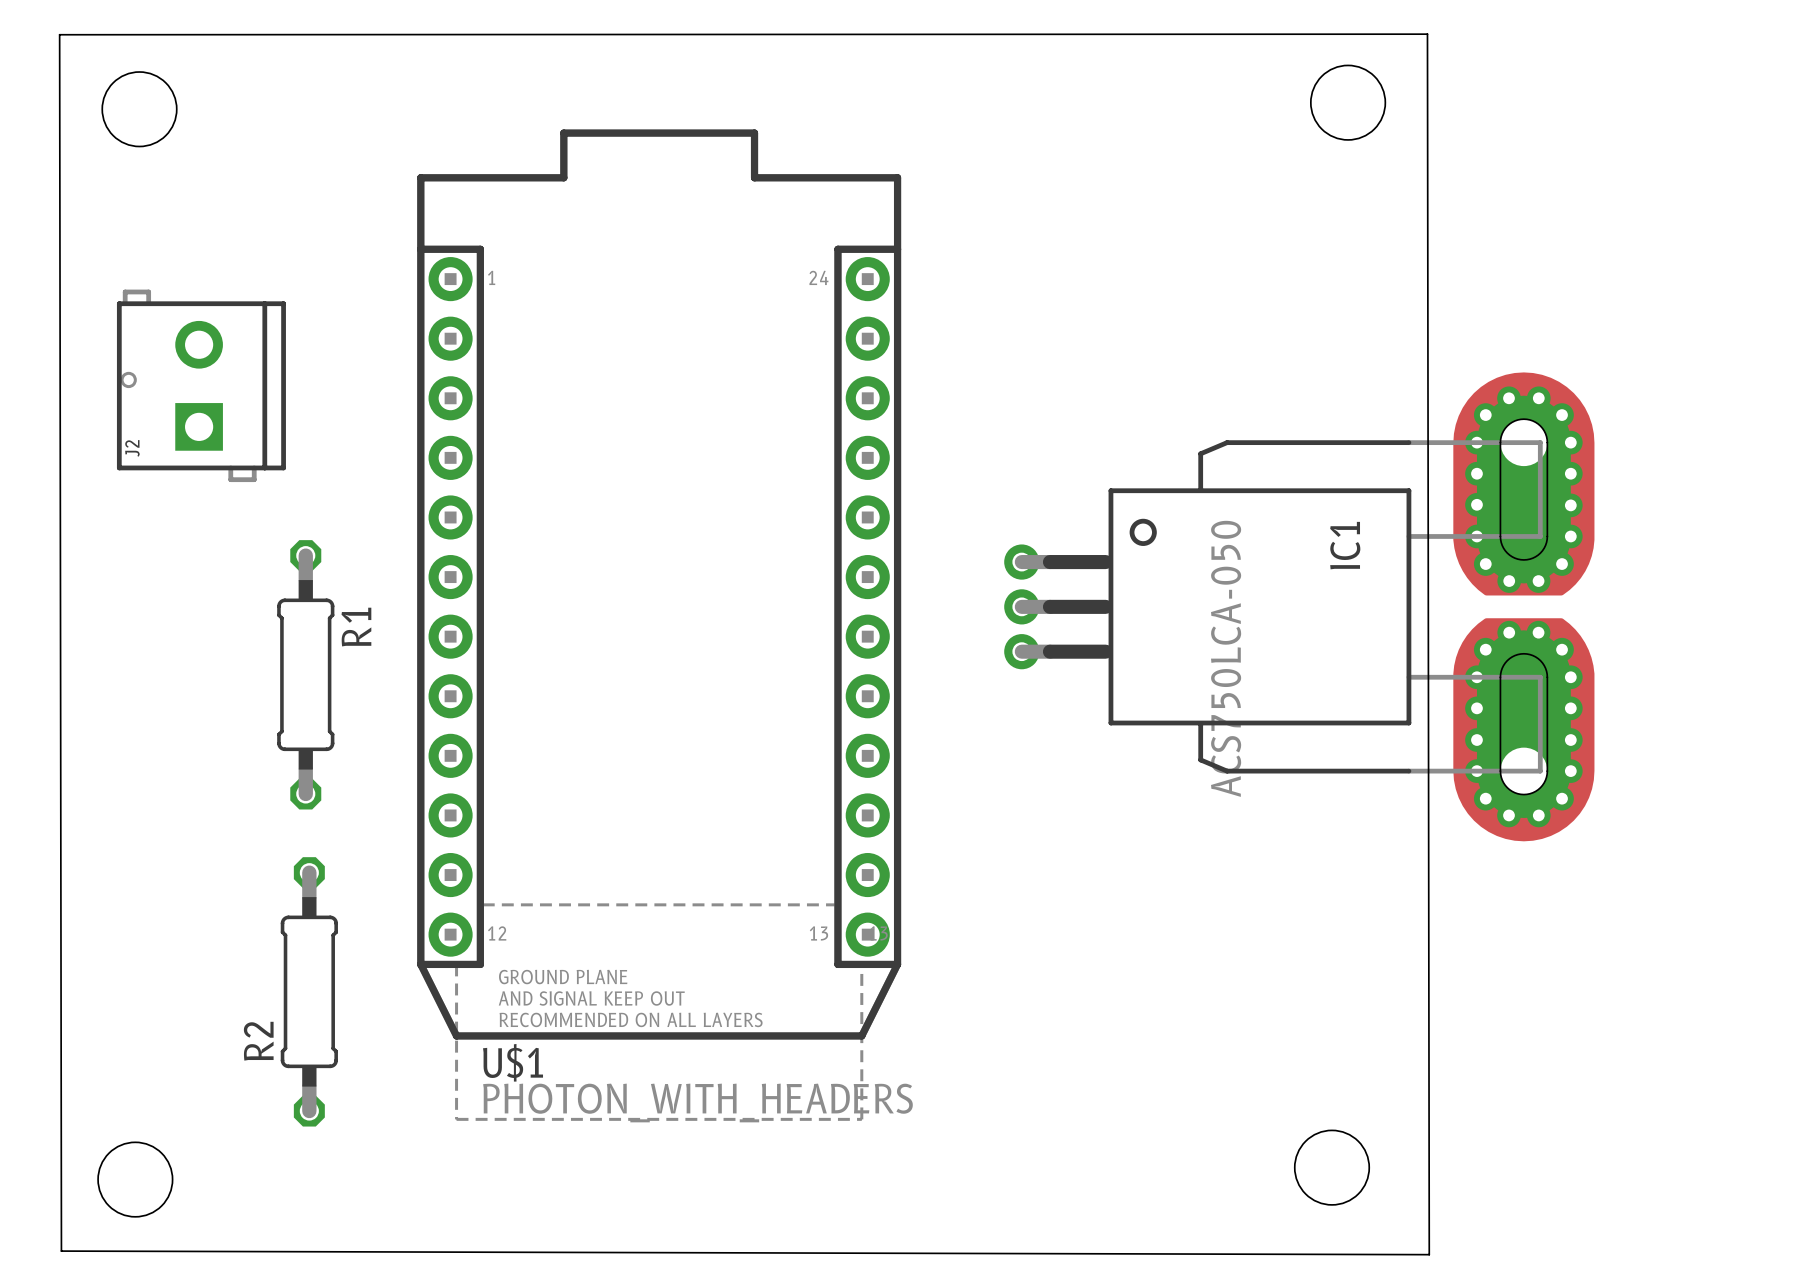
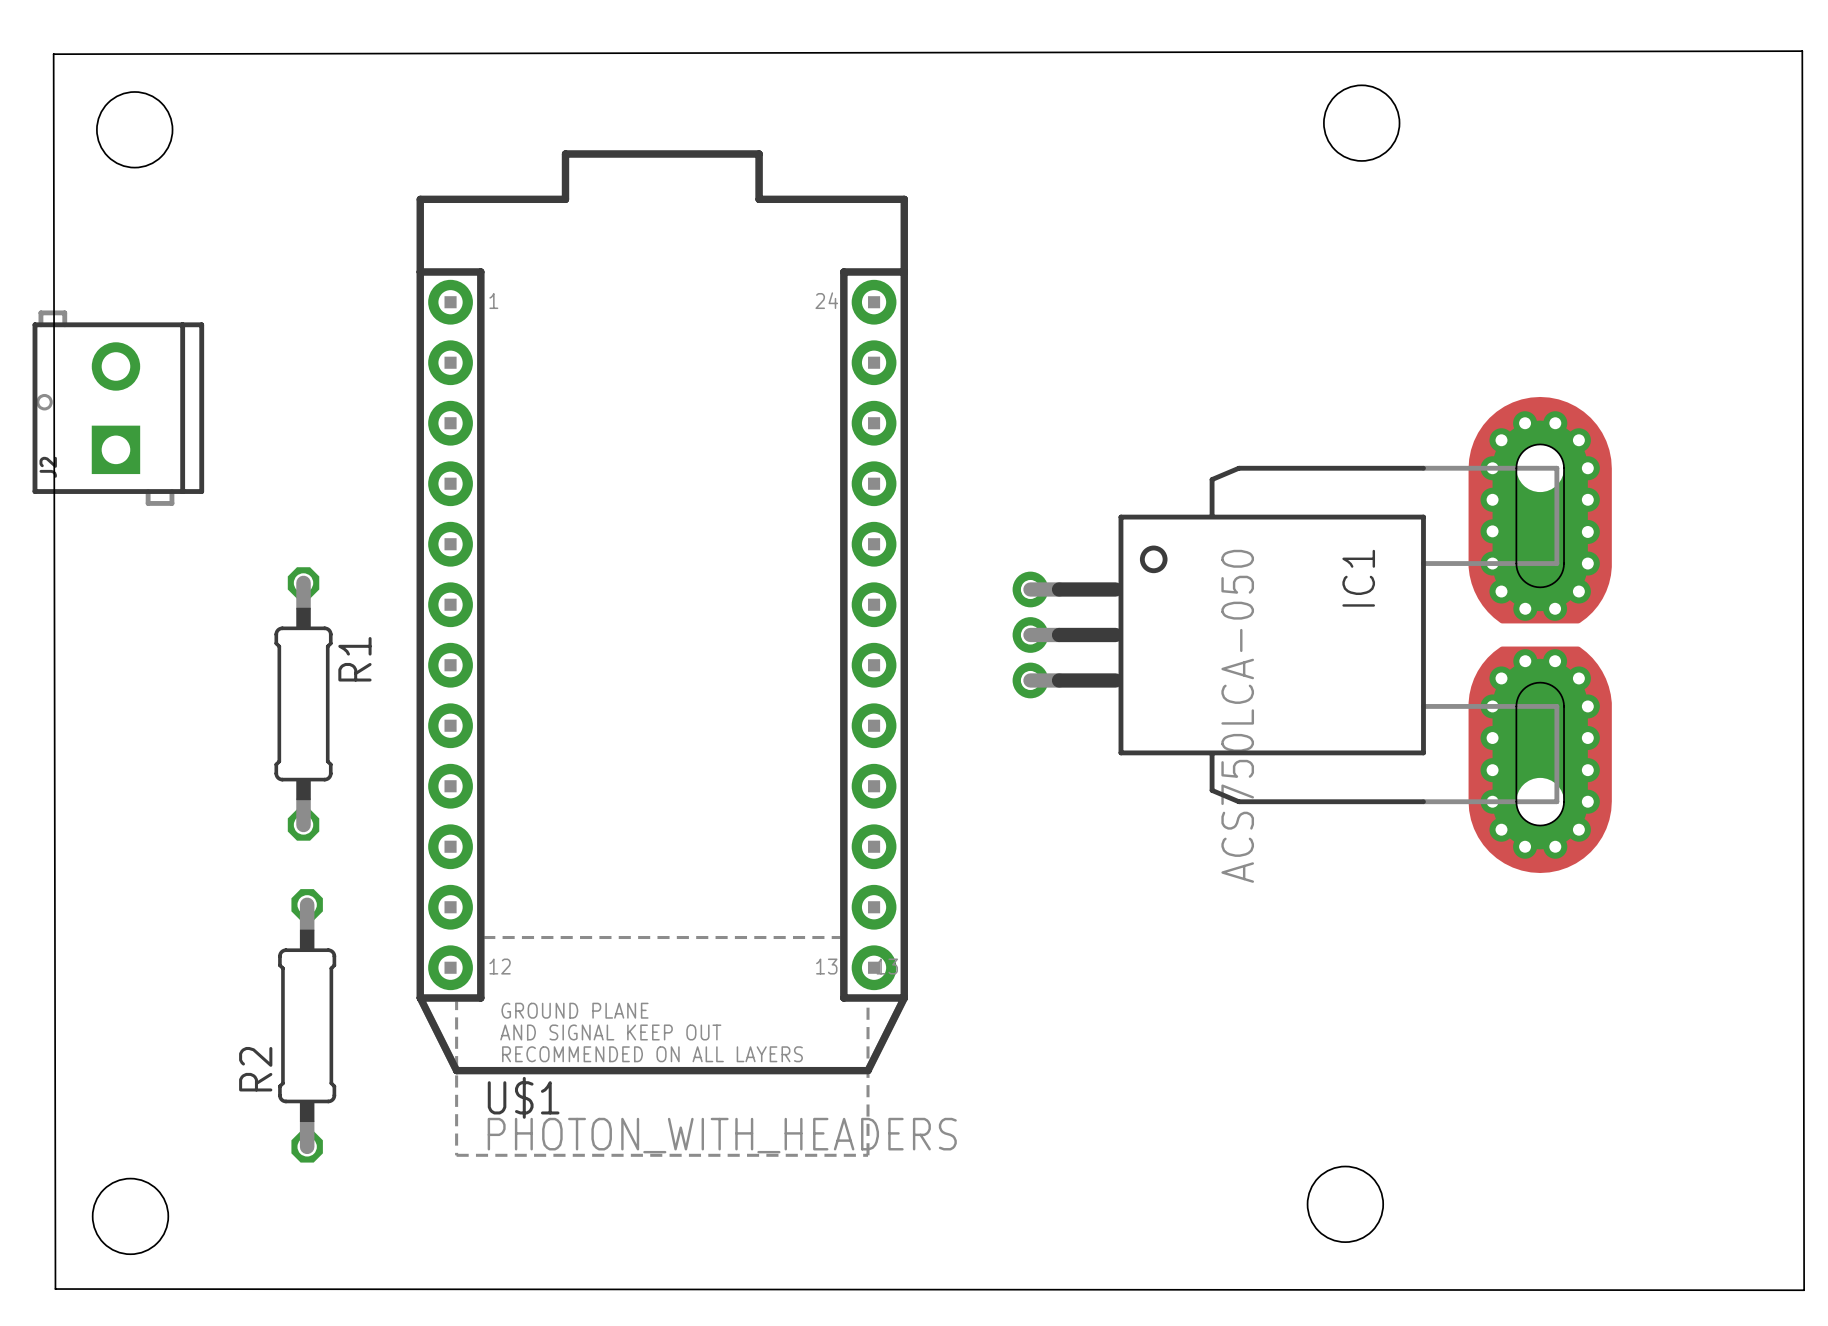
board edge: (59, 34) (1427, 34) (1429, 1254) (61, 1251) -> (53, 54) (1802, 51) (1804, 1290) (55, 1289)
J2 position: (201, 385) -> (118, 408)

